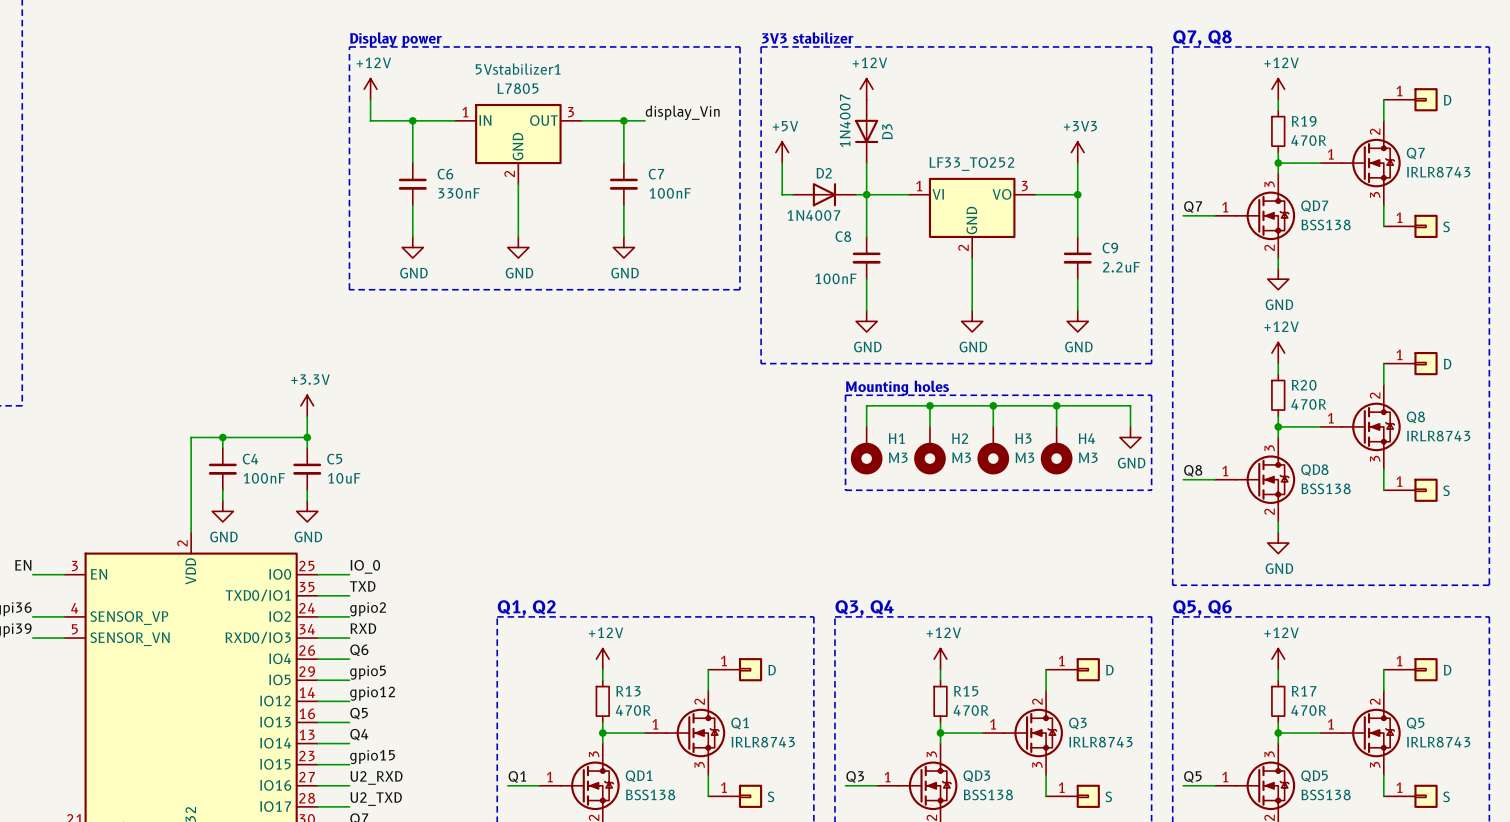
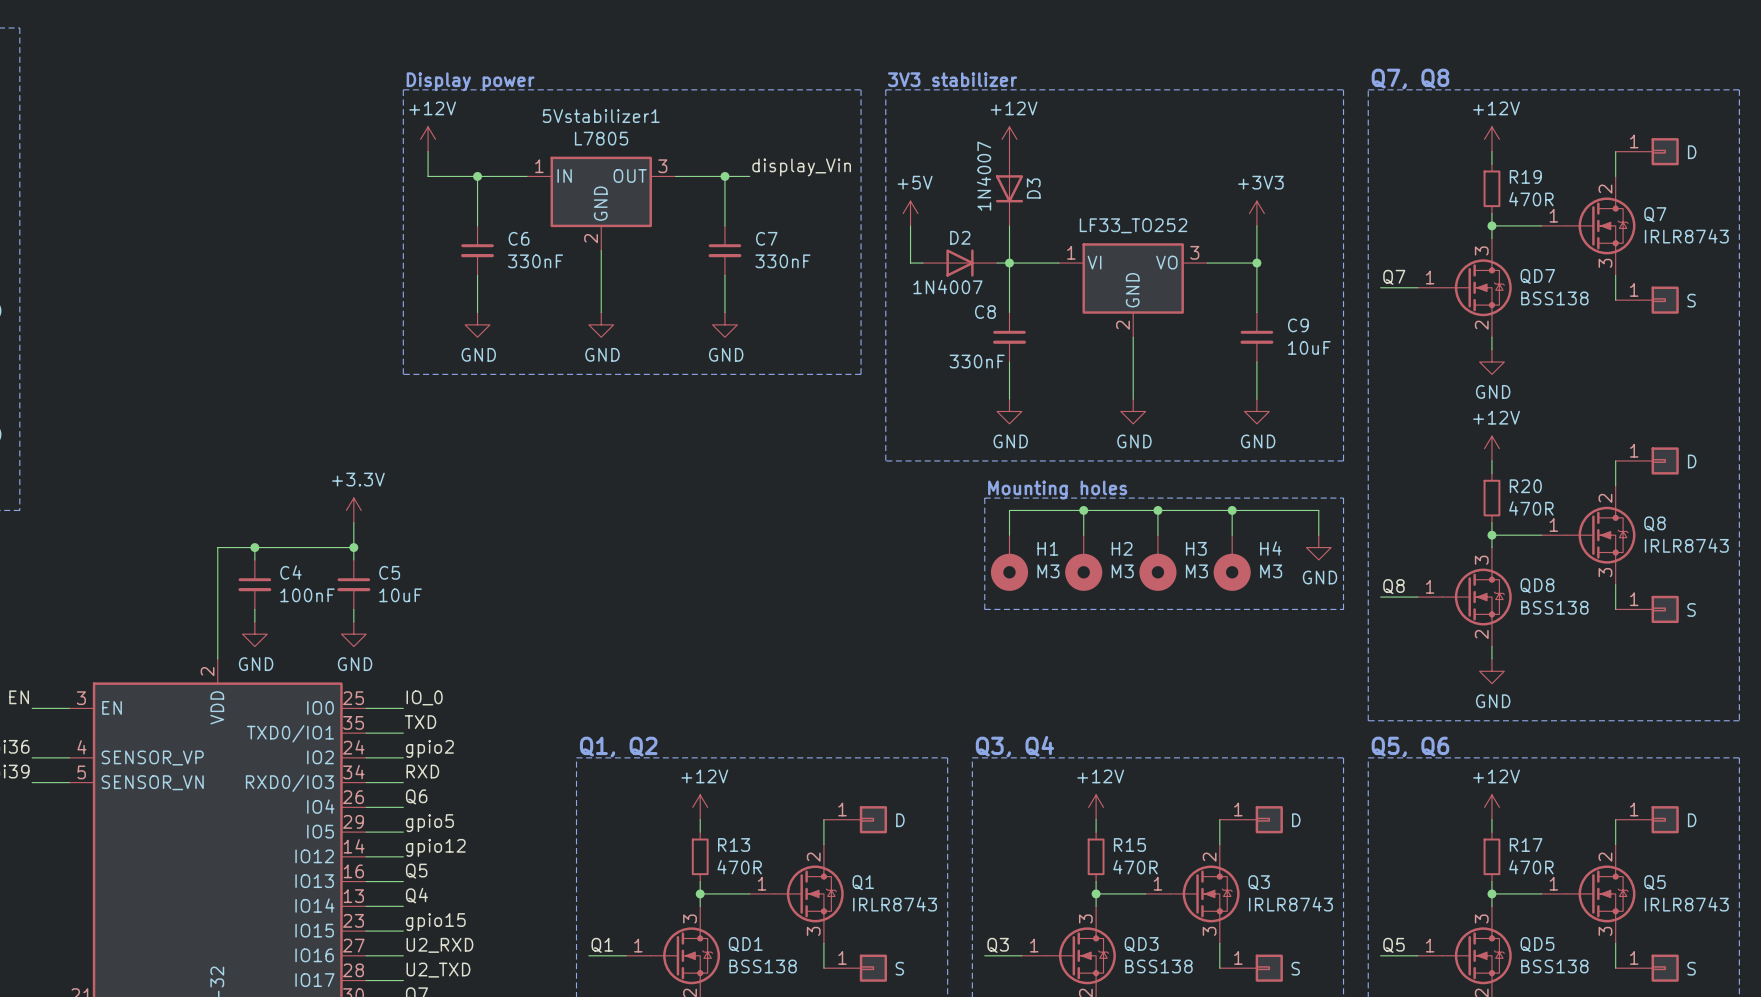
C7 value: 100nF (670, 193) -> 330nF (782, 261)
C9 value: 2.2uF (1121, 267) -> 10uF (1309, 347)
C8 value: 100nF (835, 278) -> 330nF (977, 361)

